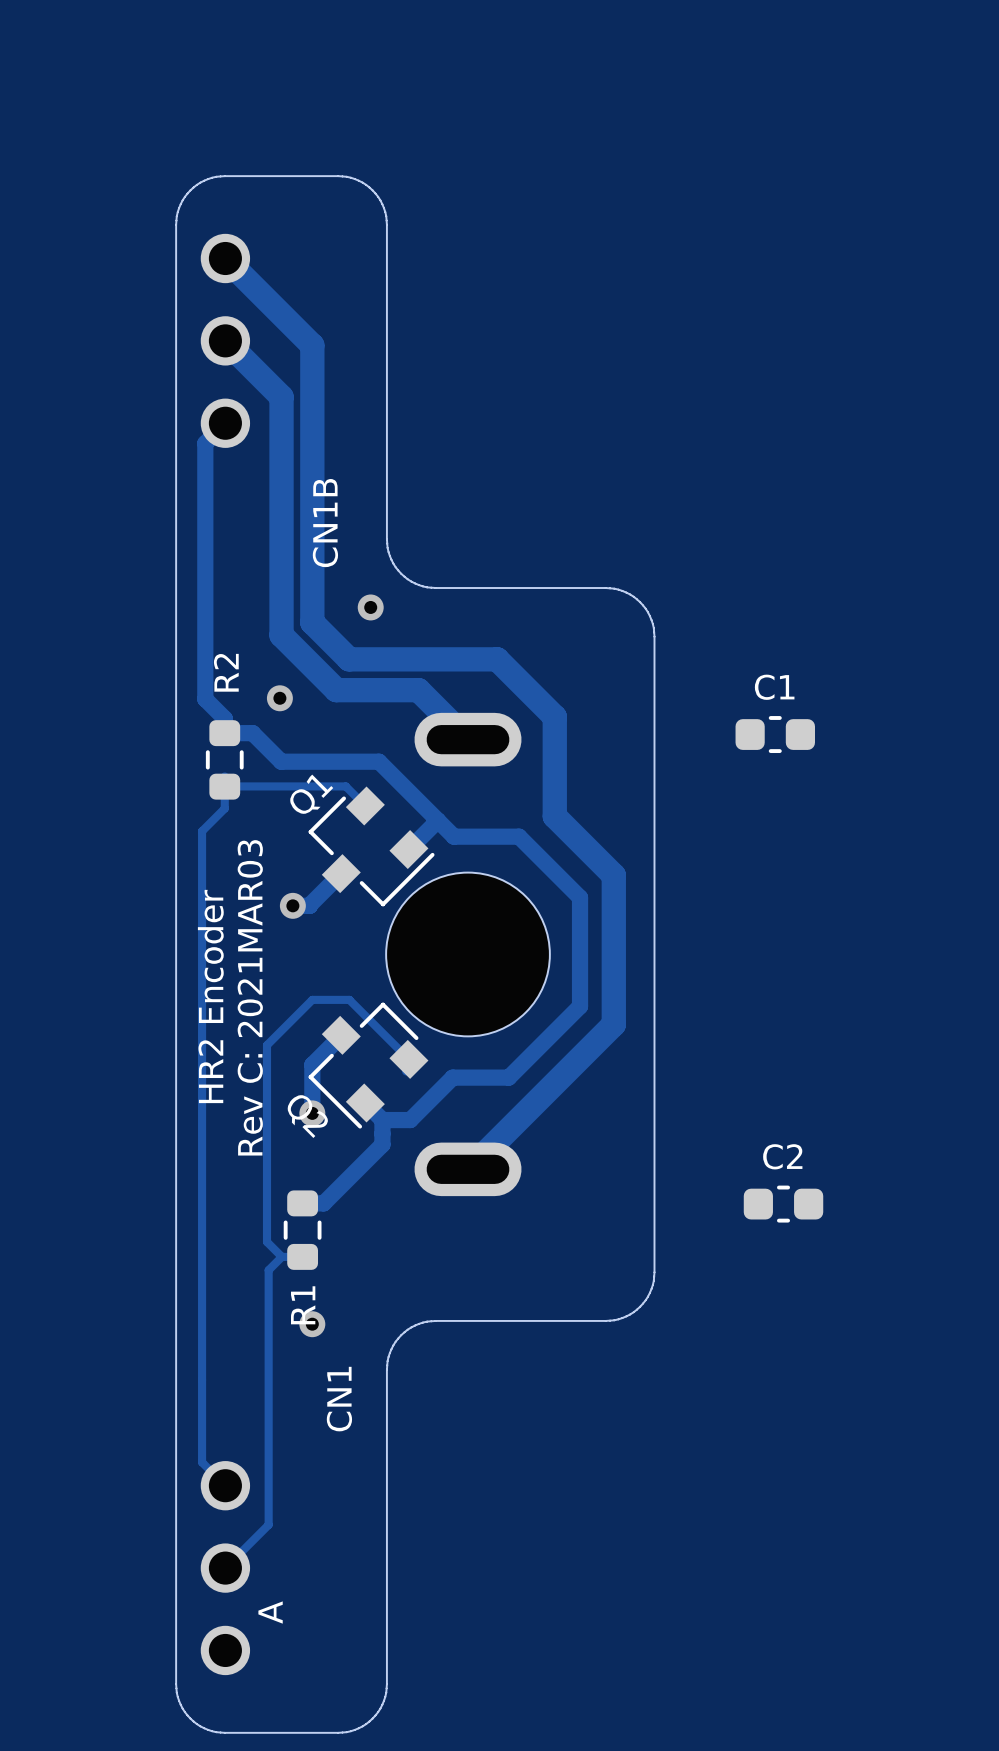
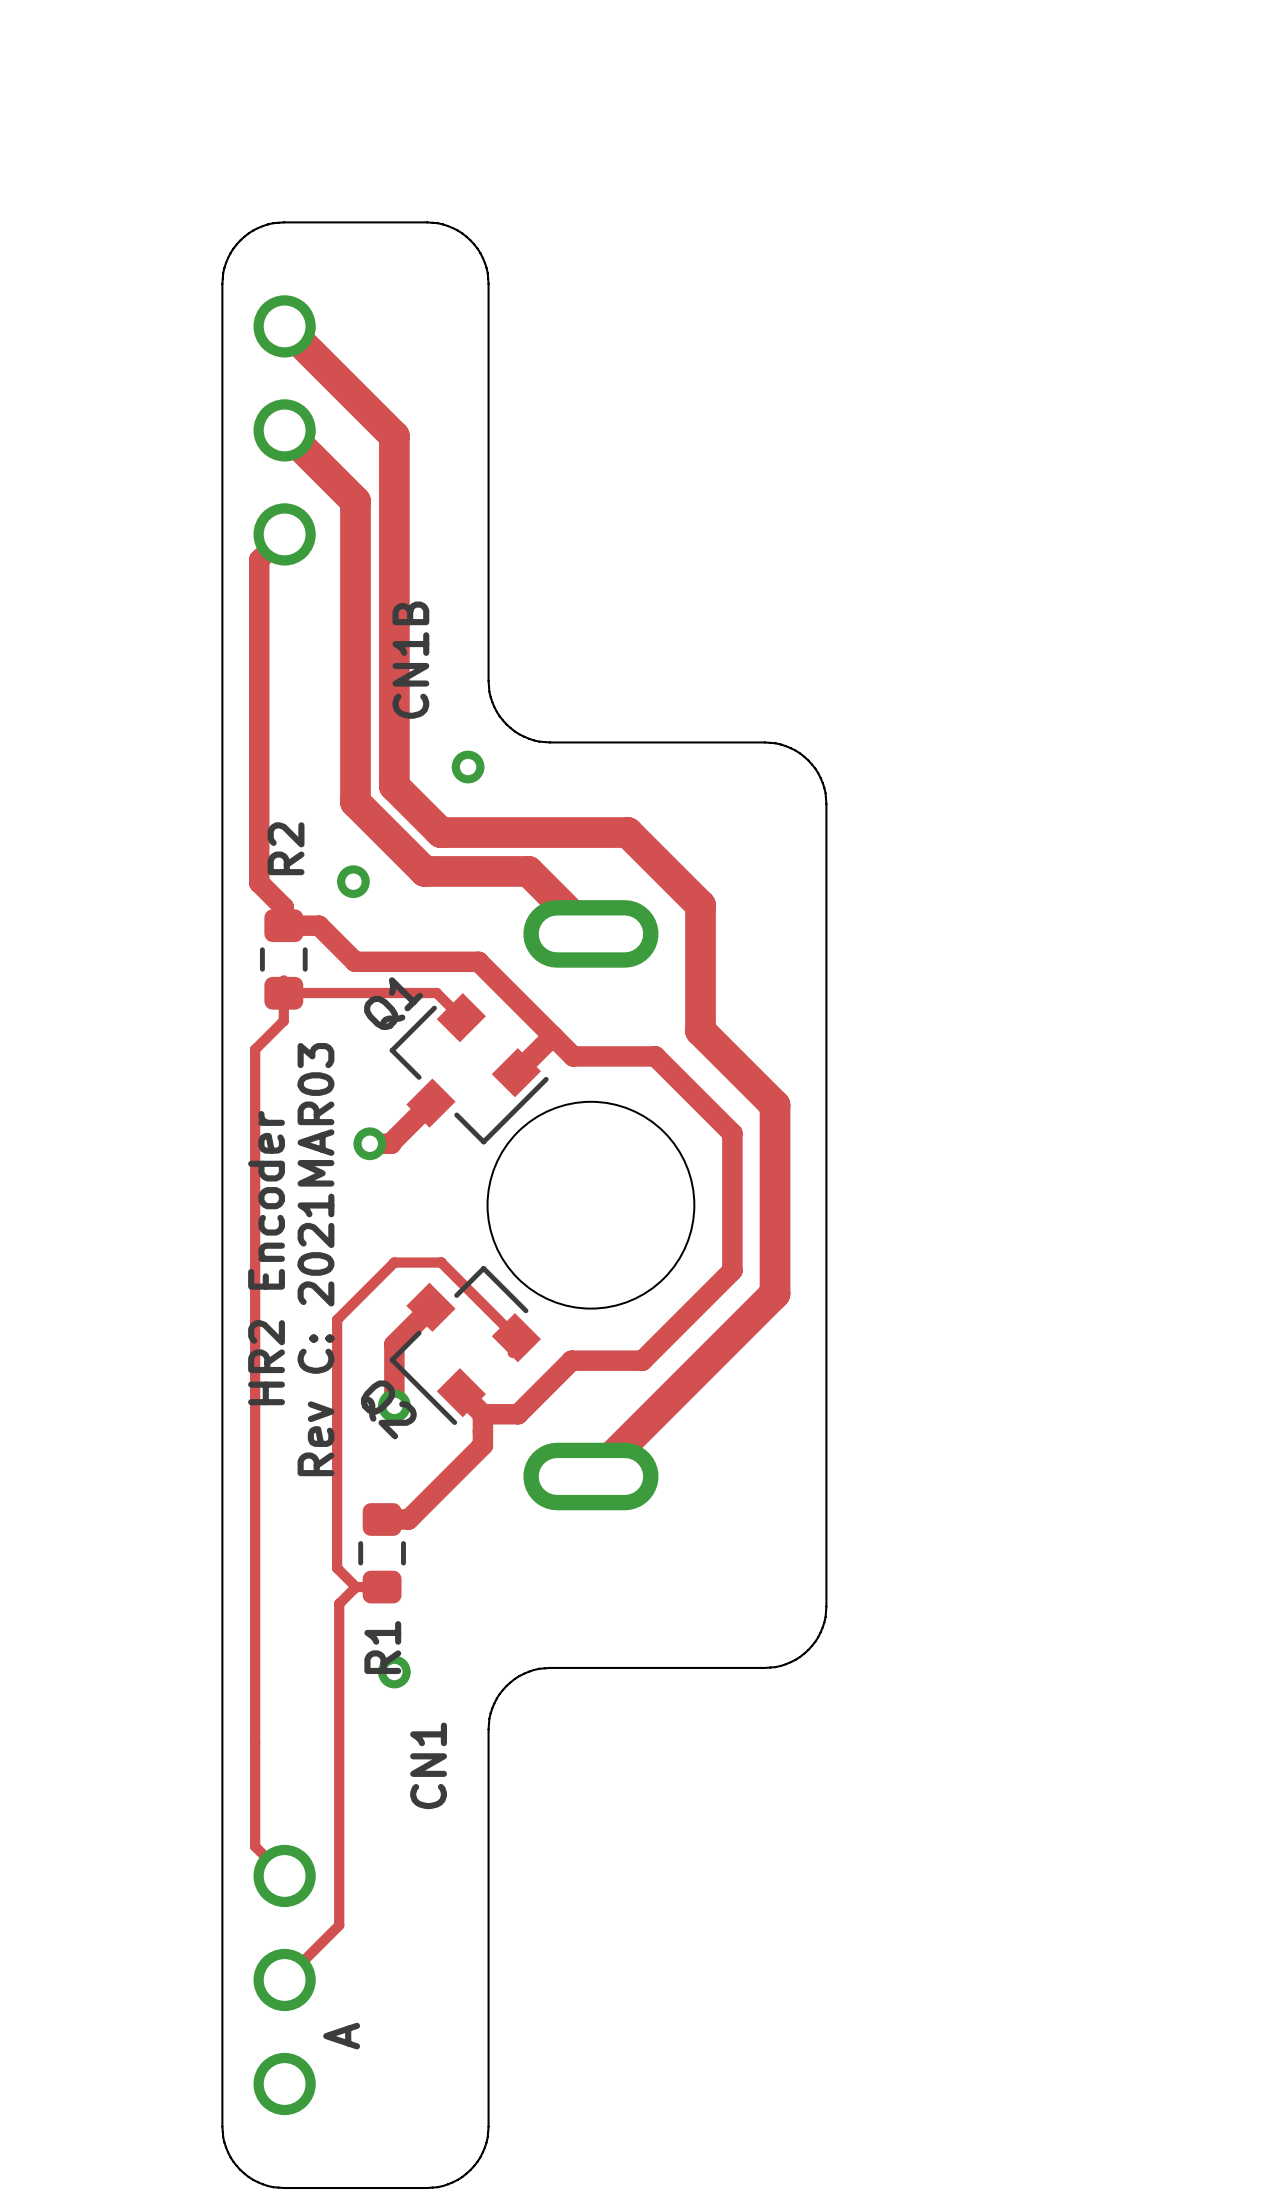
C1: (775, 734) -> none
C2: (783, 1204) -> none

